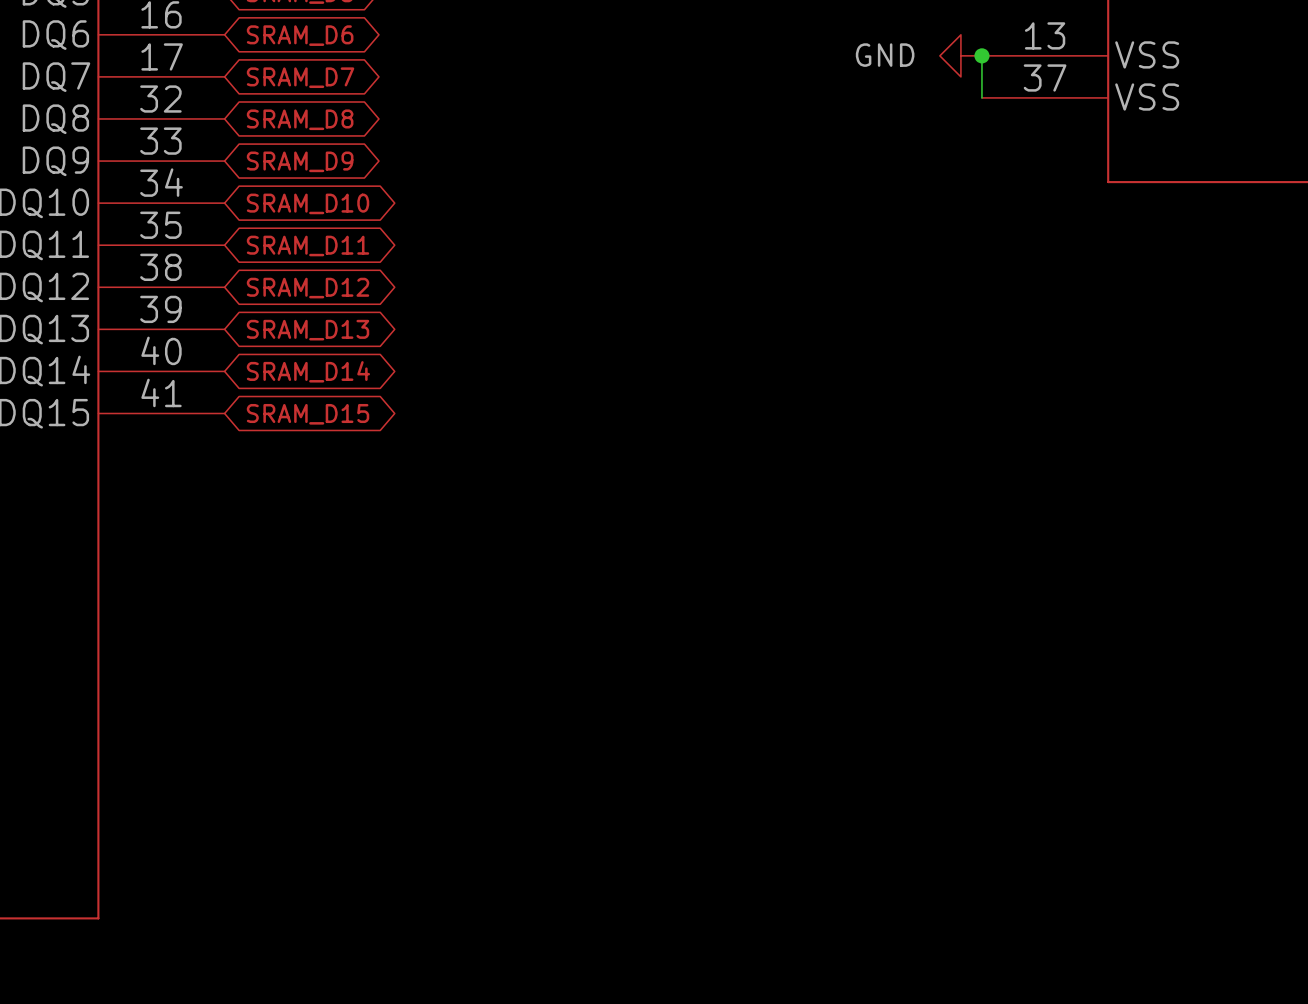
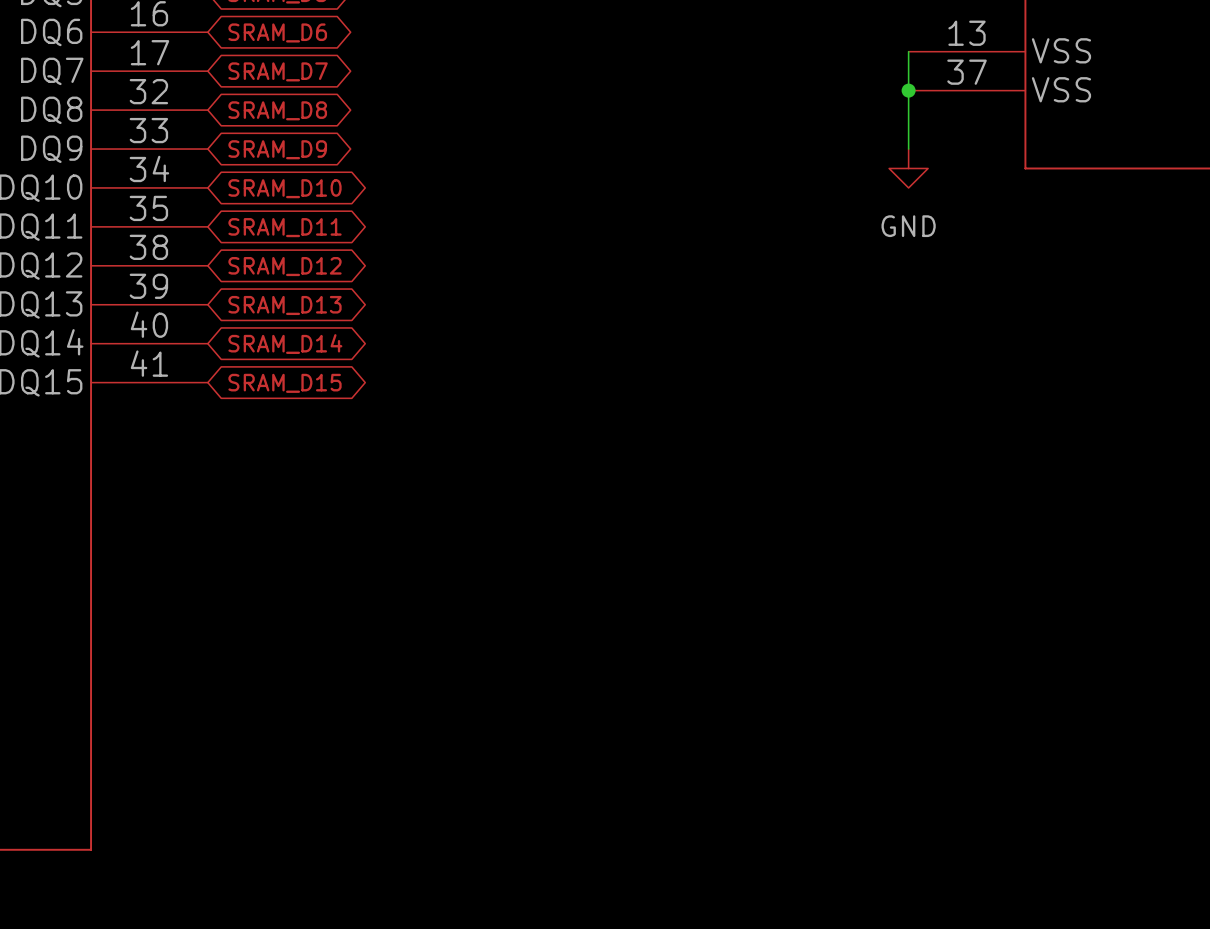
power symbol rotation: 0° (960, 55) -> 90° counterclockwise (908, 168)
power symbol position: GND (960, 55) -> GND (908, 168)
junction position: (981, 55) -> (908, 90)
wire: none -> (908, 90) (908, 149)

